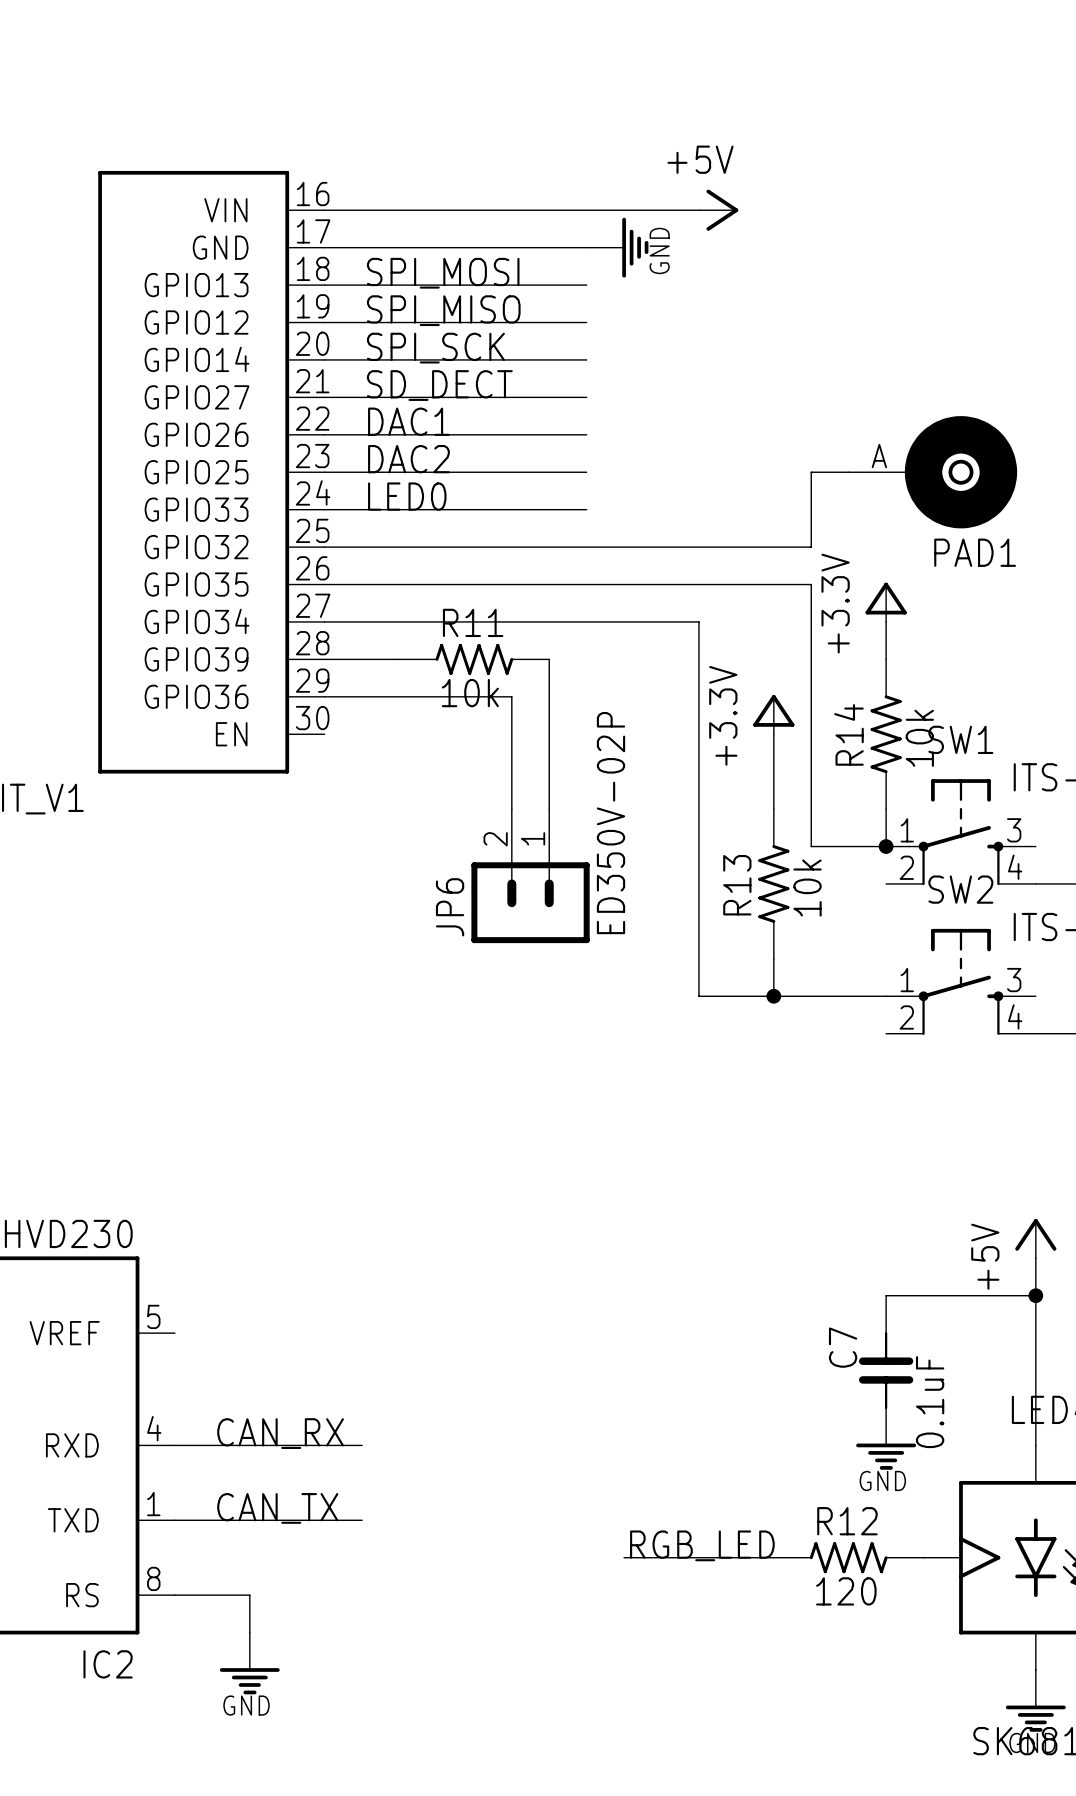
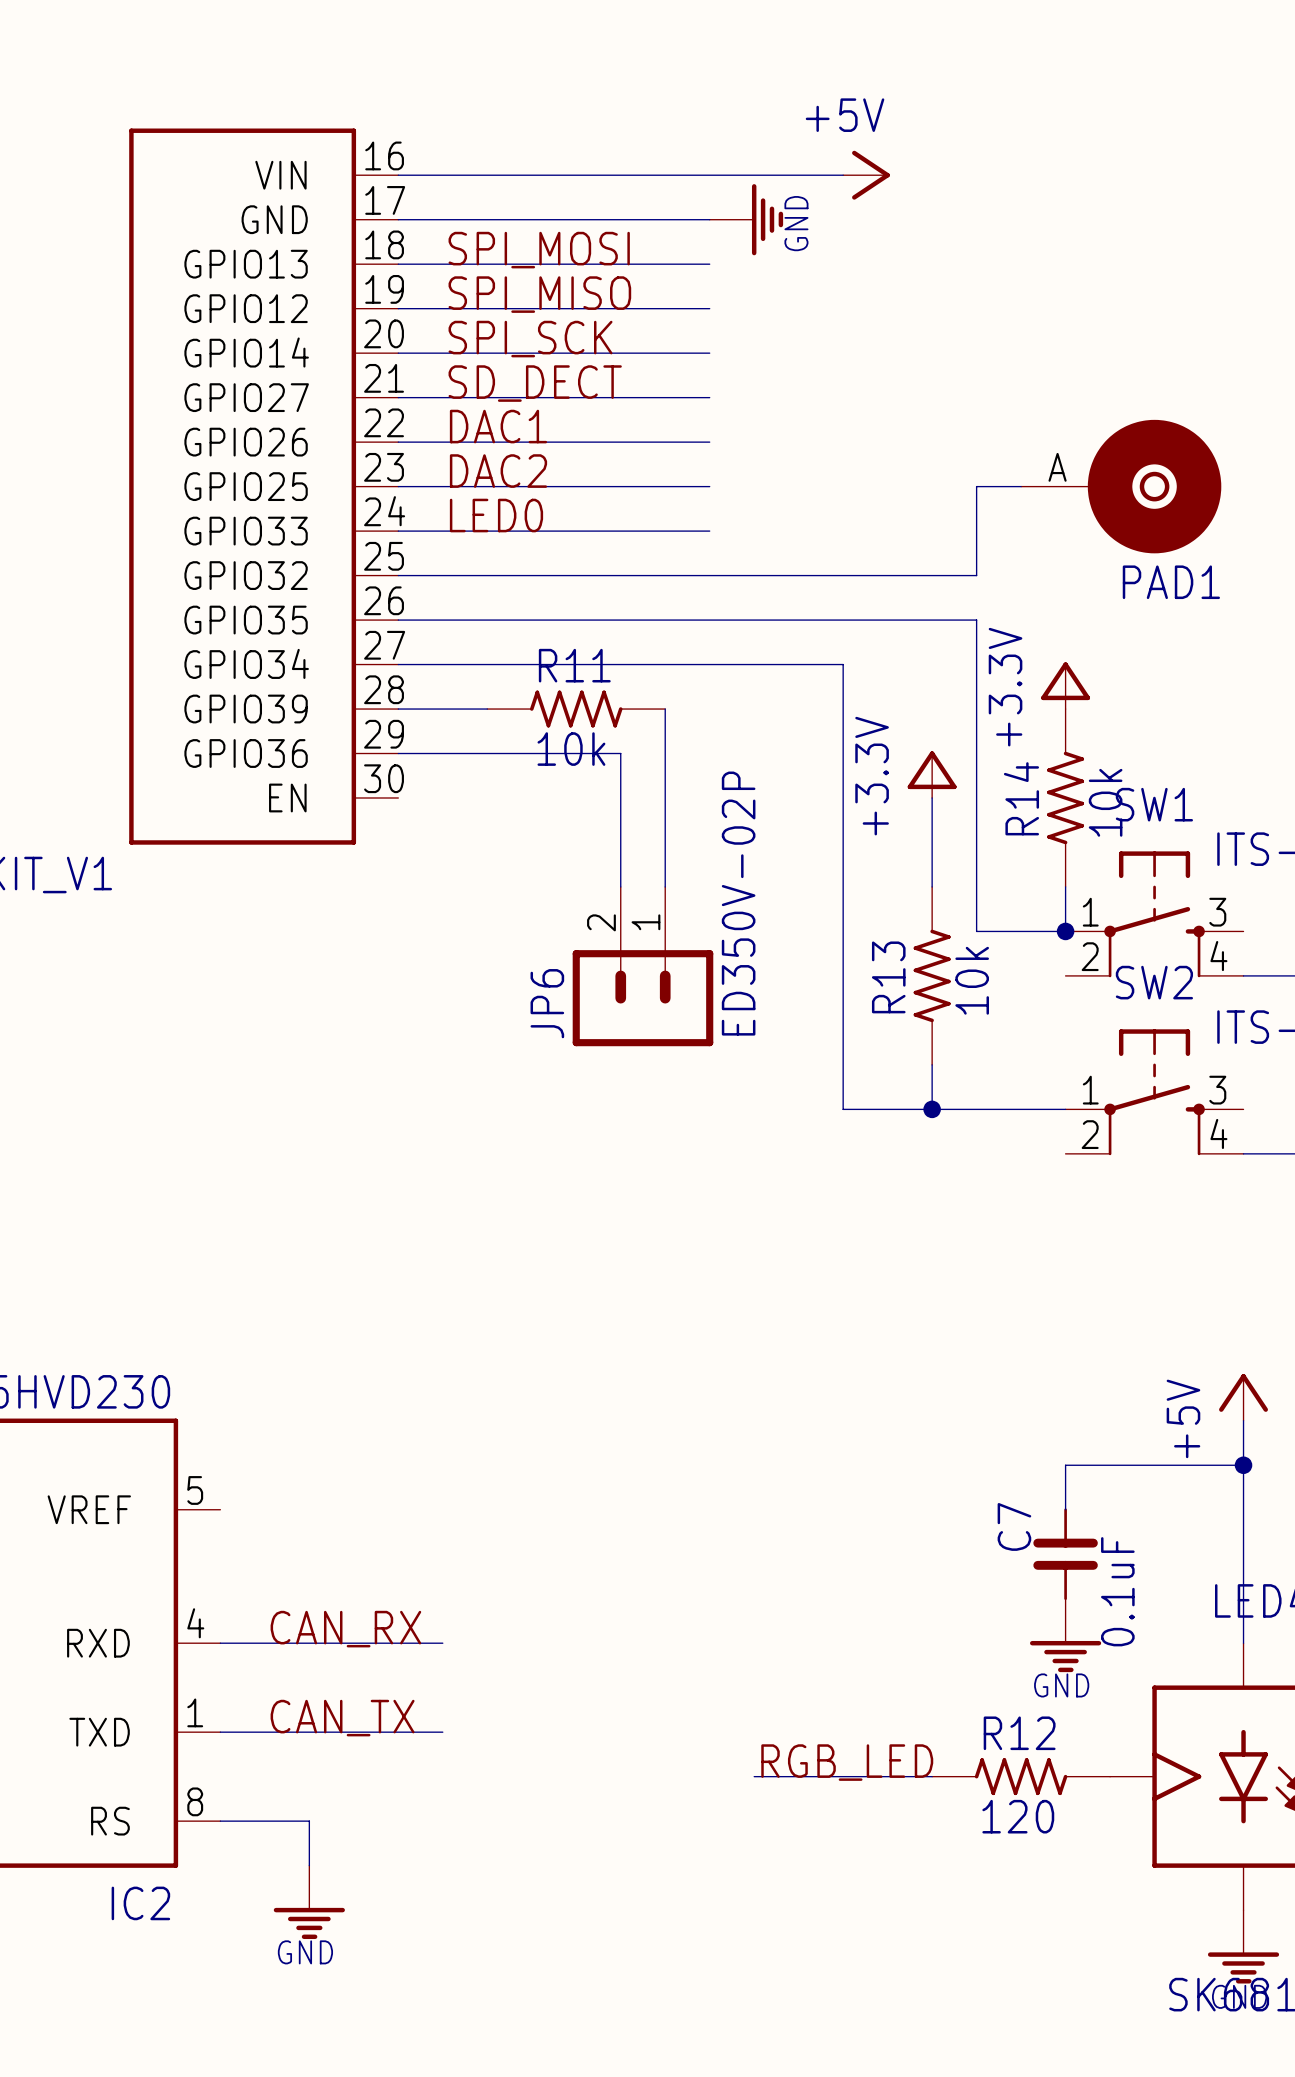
power symbol position: (886, 602) -> (1065, 685)

